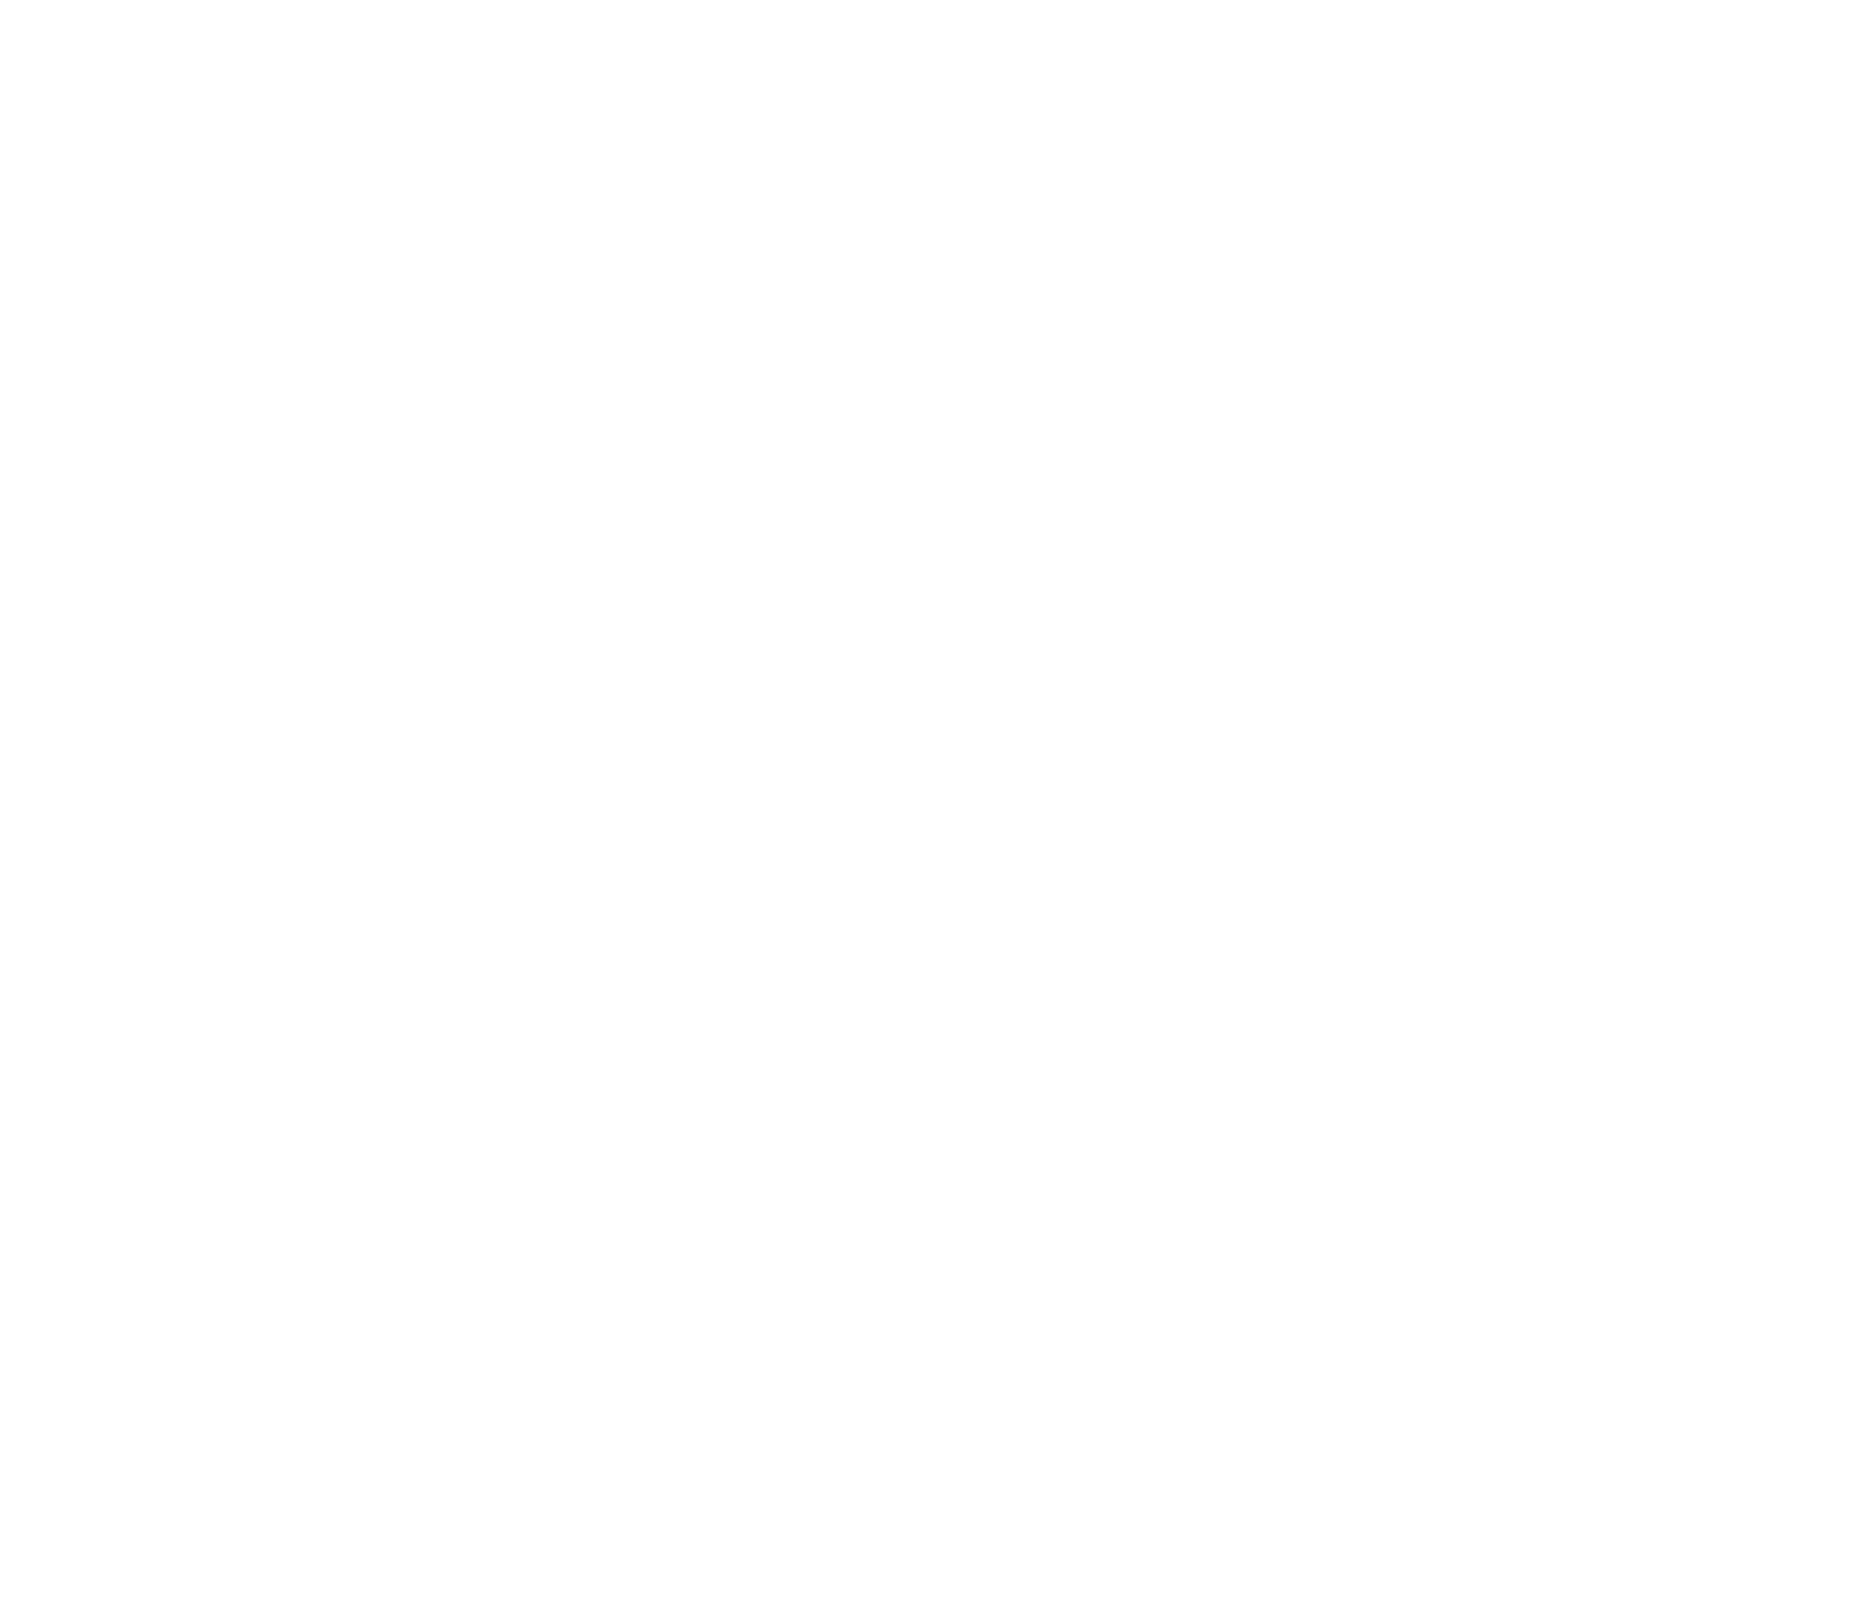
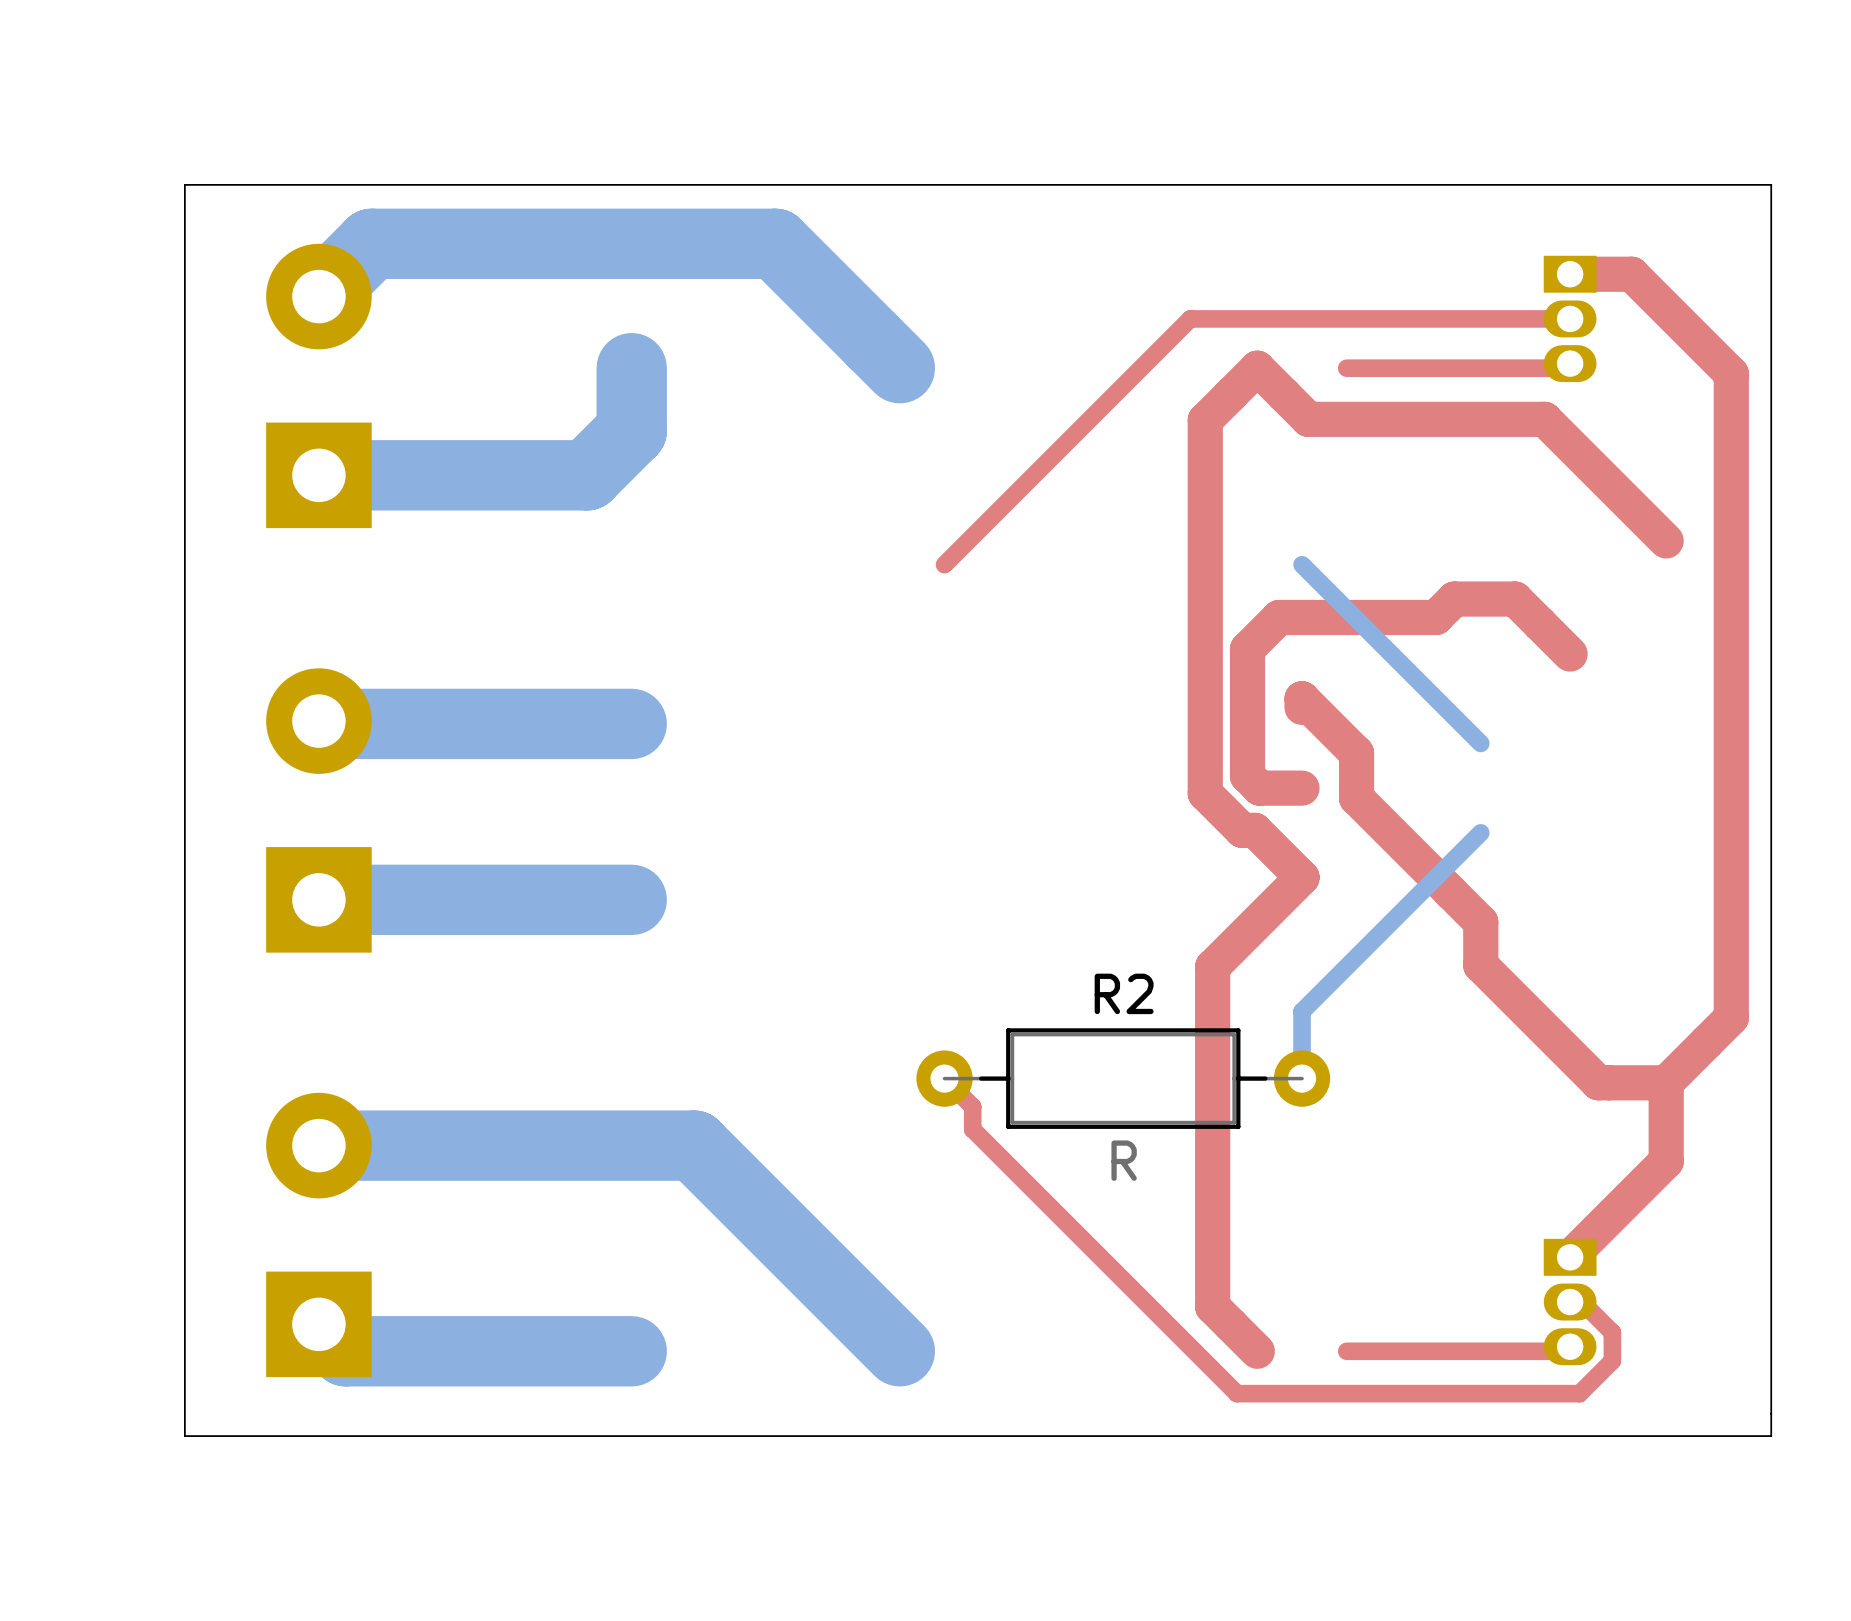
board edge: none -> (1771, 184) (1771, 1436) (184, 1436) (184, 184) (1771, 184)
top track: none -> (1570, 274) (1631, 274) (1731, 373) (1731, 1017) (1666, 1082)
bottom track: none -> (318, 296) (371, 243) (775, 243) (899, 368)
top track: none -> (1570, 318) (1190, 318) (944, 564)
part: none -> (1570, 318)
top track: none -> (1570, 363) (1565, 368) (1346, 368)
bottom track: none -> (631, 368) (631, 430) (587, 475) (318, 475)
part: none -> (318, 385)
top track: none -> (1666, 540) (1544, 419) (1308, 419) (1257, 368) (1205, 420) (1205, 793) (1242, 830) (1254, 830) (1302, 877) (1212, 966) (1212, 1306) (1257, 1351)
bottom track: none -> (1302, 564) (1480, 743)
top track: none -> (1570, 654) (1515, 599) (1454, 599) (1435, 617) (1279, 617) (1247, 649) (1247, 775) (1259, 788) (1302, 788)
top track: none -> (1302, 707) (1302, 698) (1356, 753) (1356, 797) (1480, 922) (1480, 965) (1598, 1082) (1666, 1082)
bottom track: none -> (318, 721) (321, 723) (631, 723)
part: none -> (318, 810)
bottom track: none -> (1480, 832) (1302, 1011) (1302, 1078)
bottom track: none -> (631, 899) (318, 899)
top track: none -> (944, 1078) (972, 1106) (972, 1129) (1237, 1393) (1579, 1393) (1612, 1360) (1612, 1332) (1581, 1302) (1570, 1302)
R2: none -> R (1123, 1078)
top track: none -> (1666, 1082) (1666, 1161) (1570, 1257)
bottom track: none -> (318, 1145) (694, 1145) (899, 1351)
part: none -> (318, 1234)
part: none -> (1570, 1302)
bottom track: none -> (318, 1324) (345, 1351) (631, 1351)
top track: none -> (1570, 1346) (1565, 1351) (1346, 1351)

